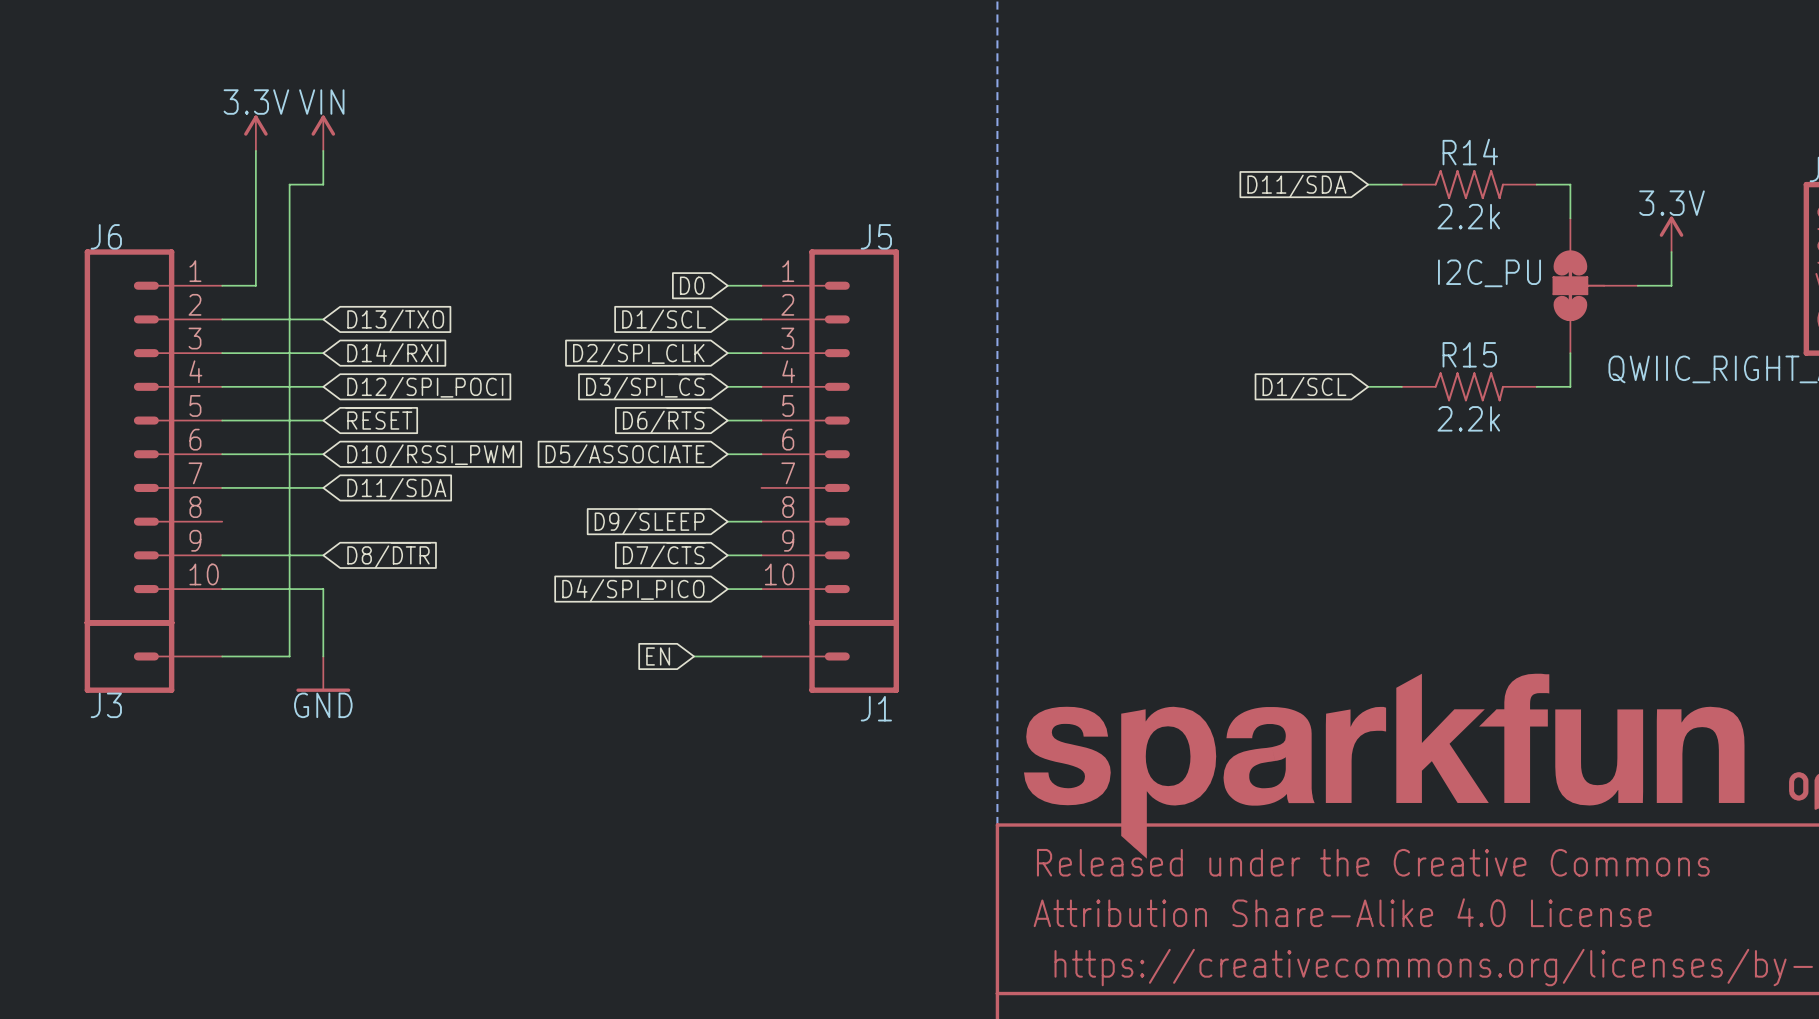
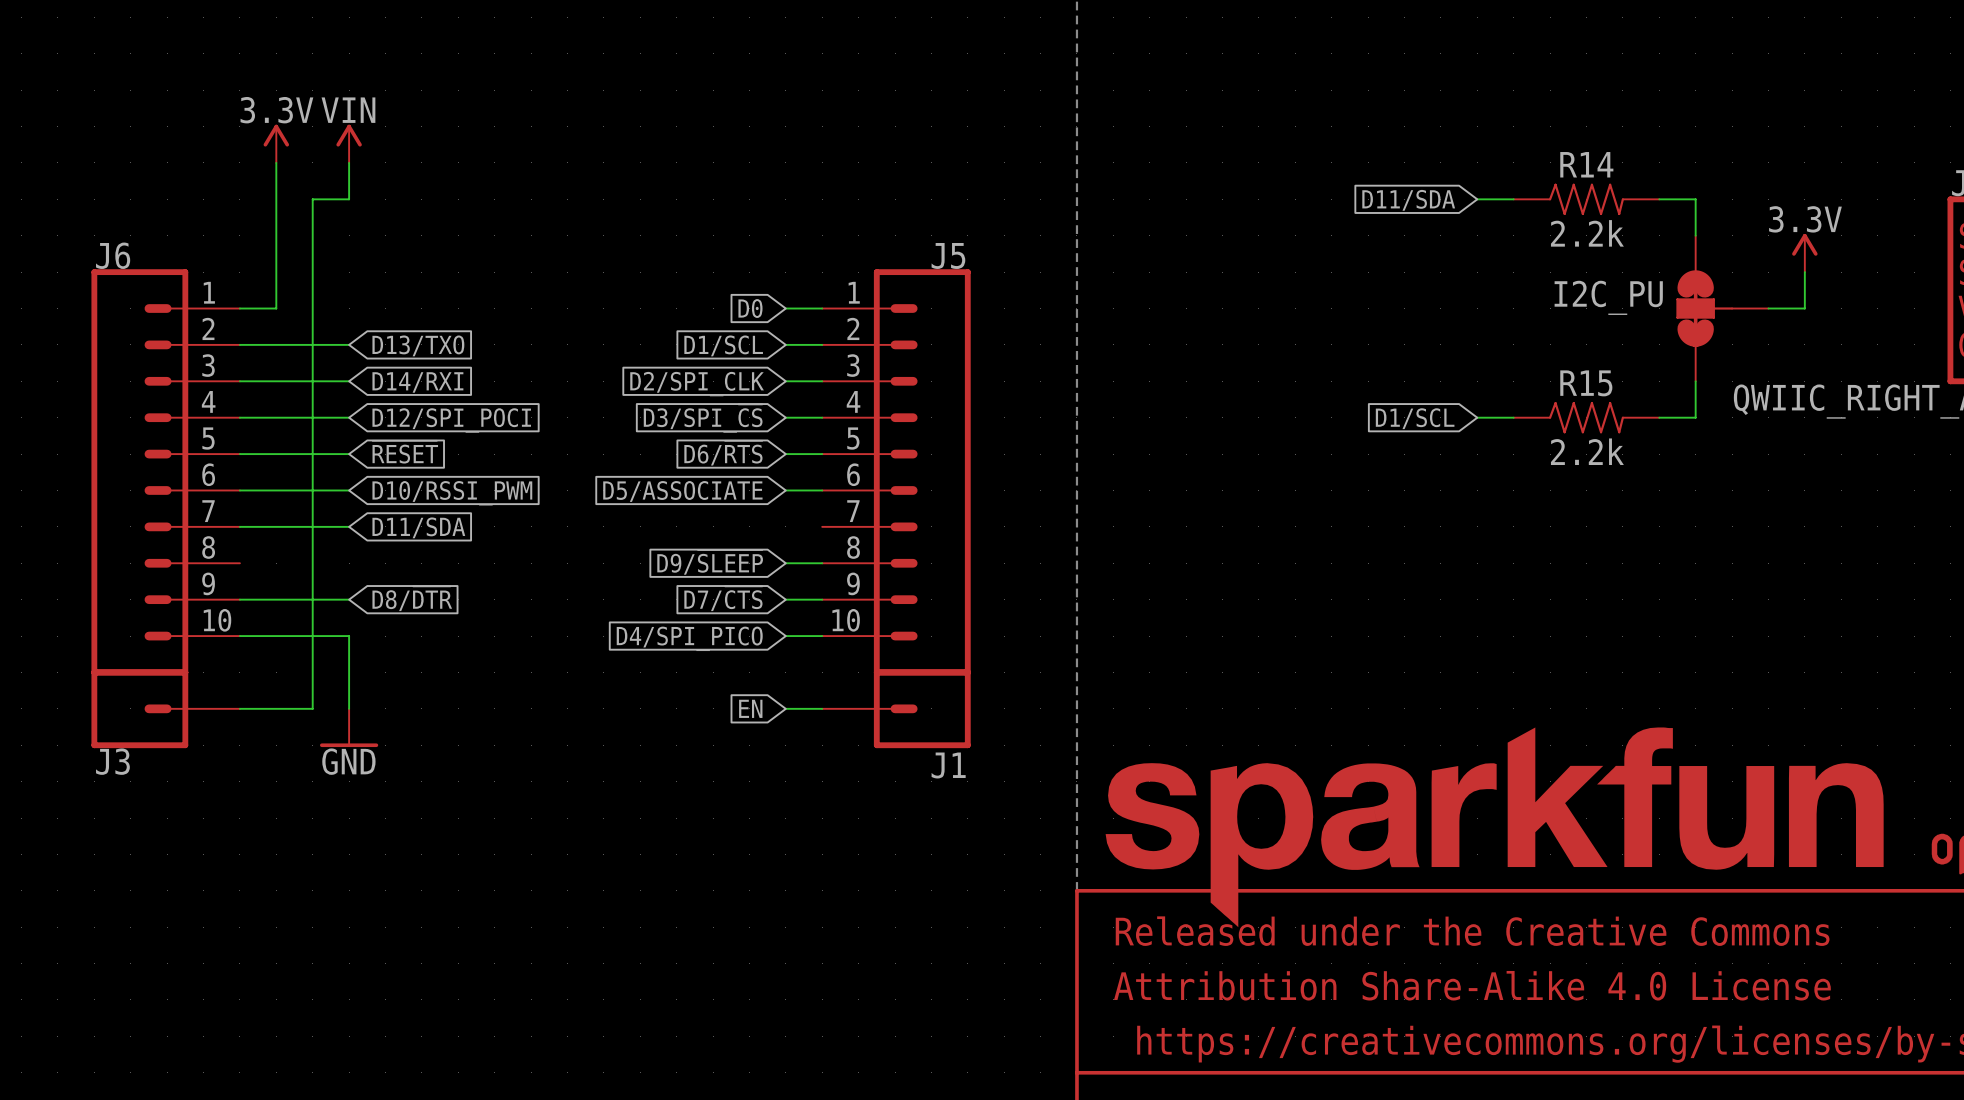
global label position: EN (658, 656) -> EN (750, 708)
wire: (694, 656) (727, 656) -> none

